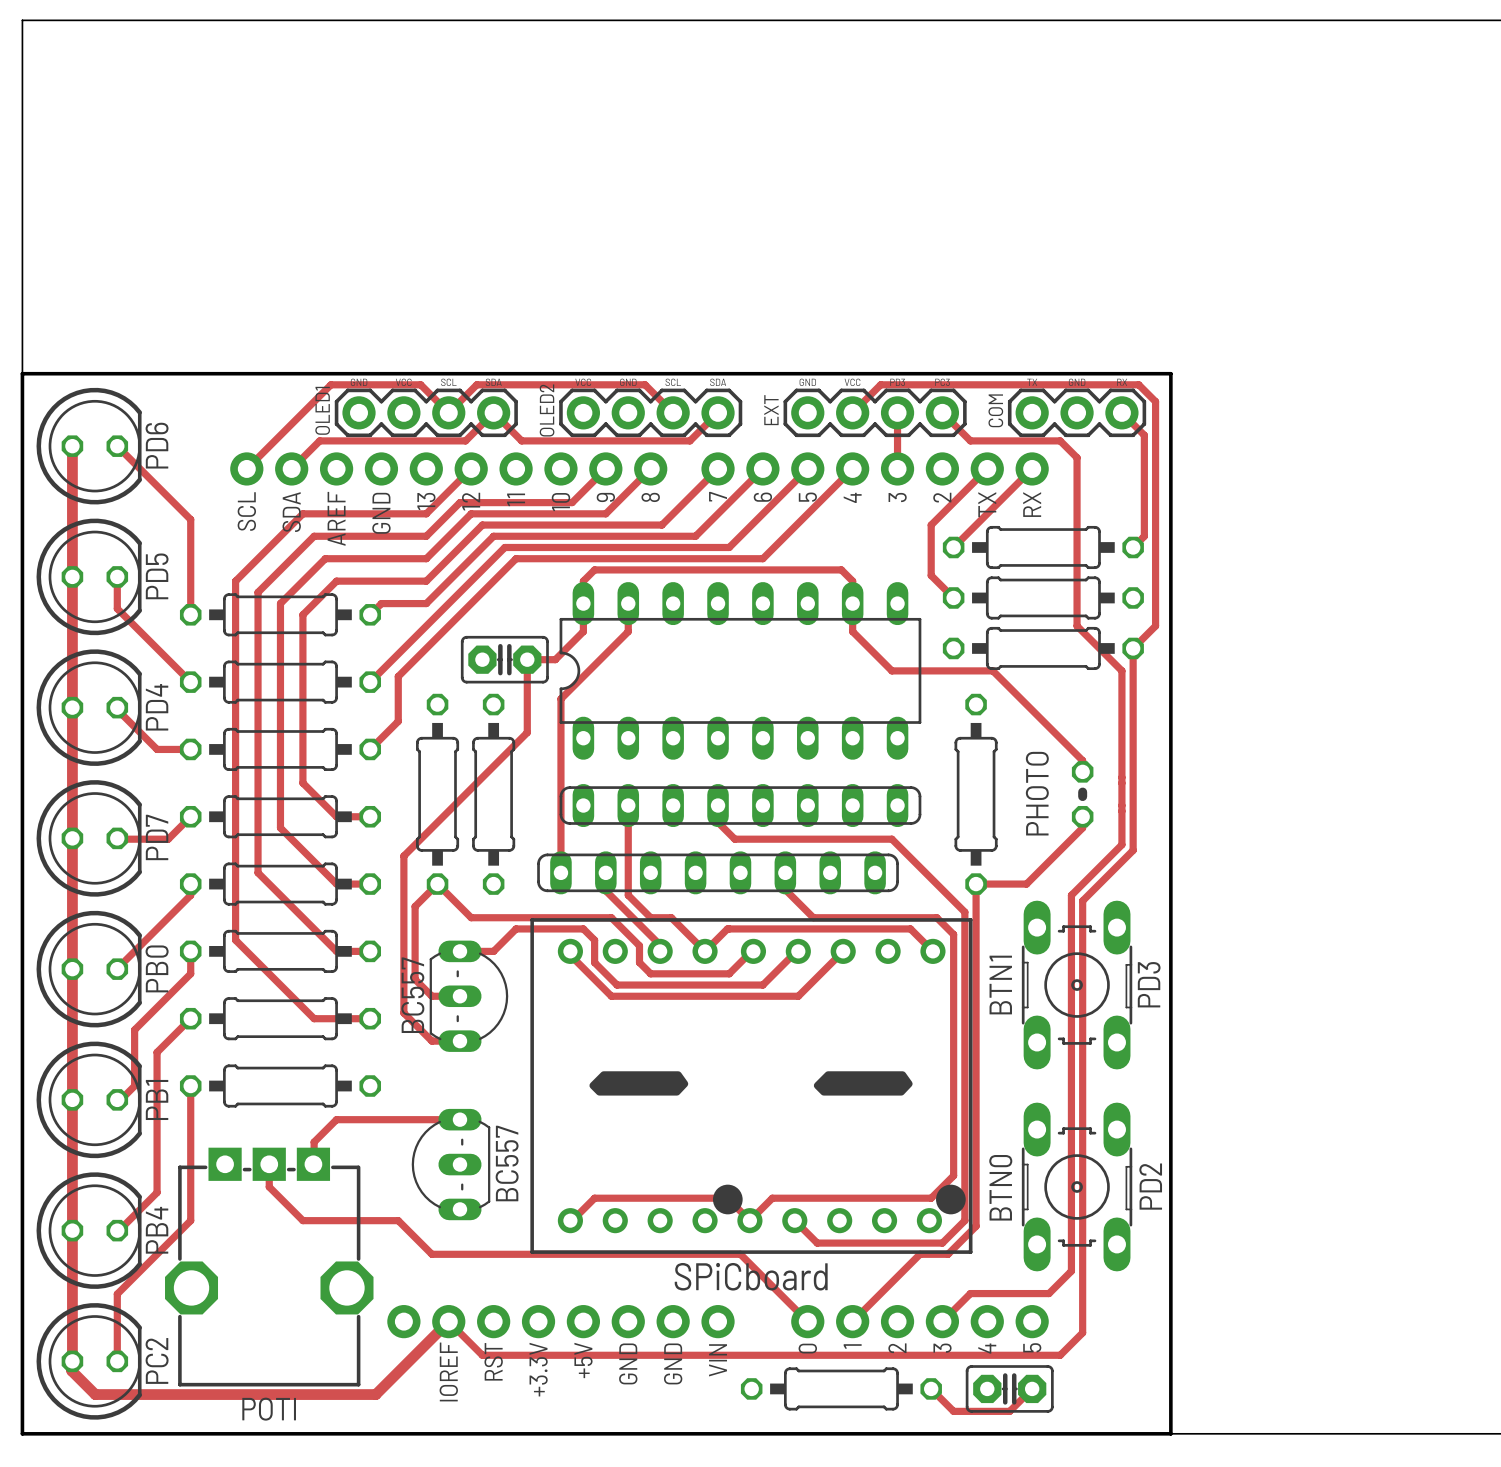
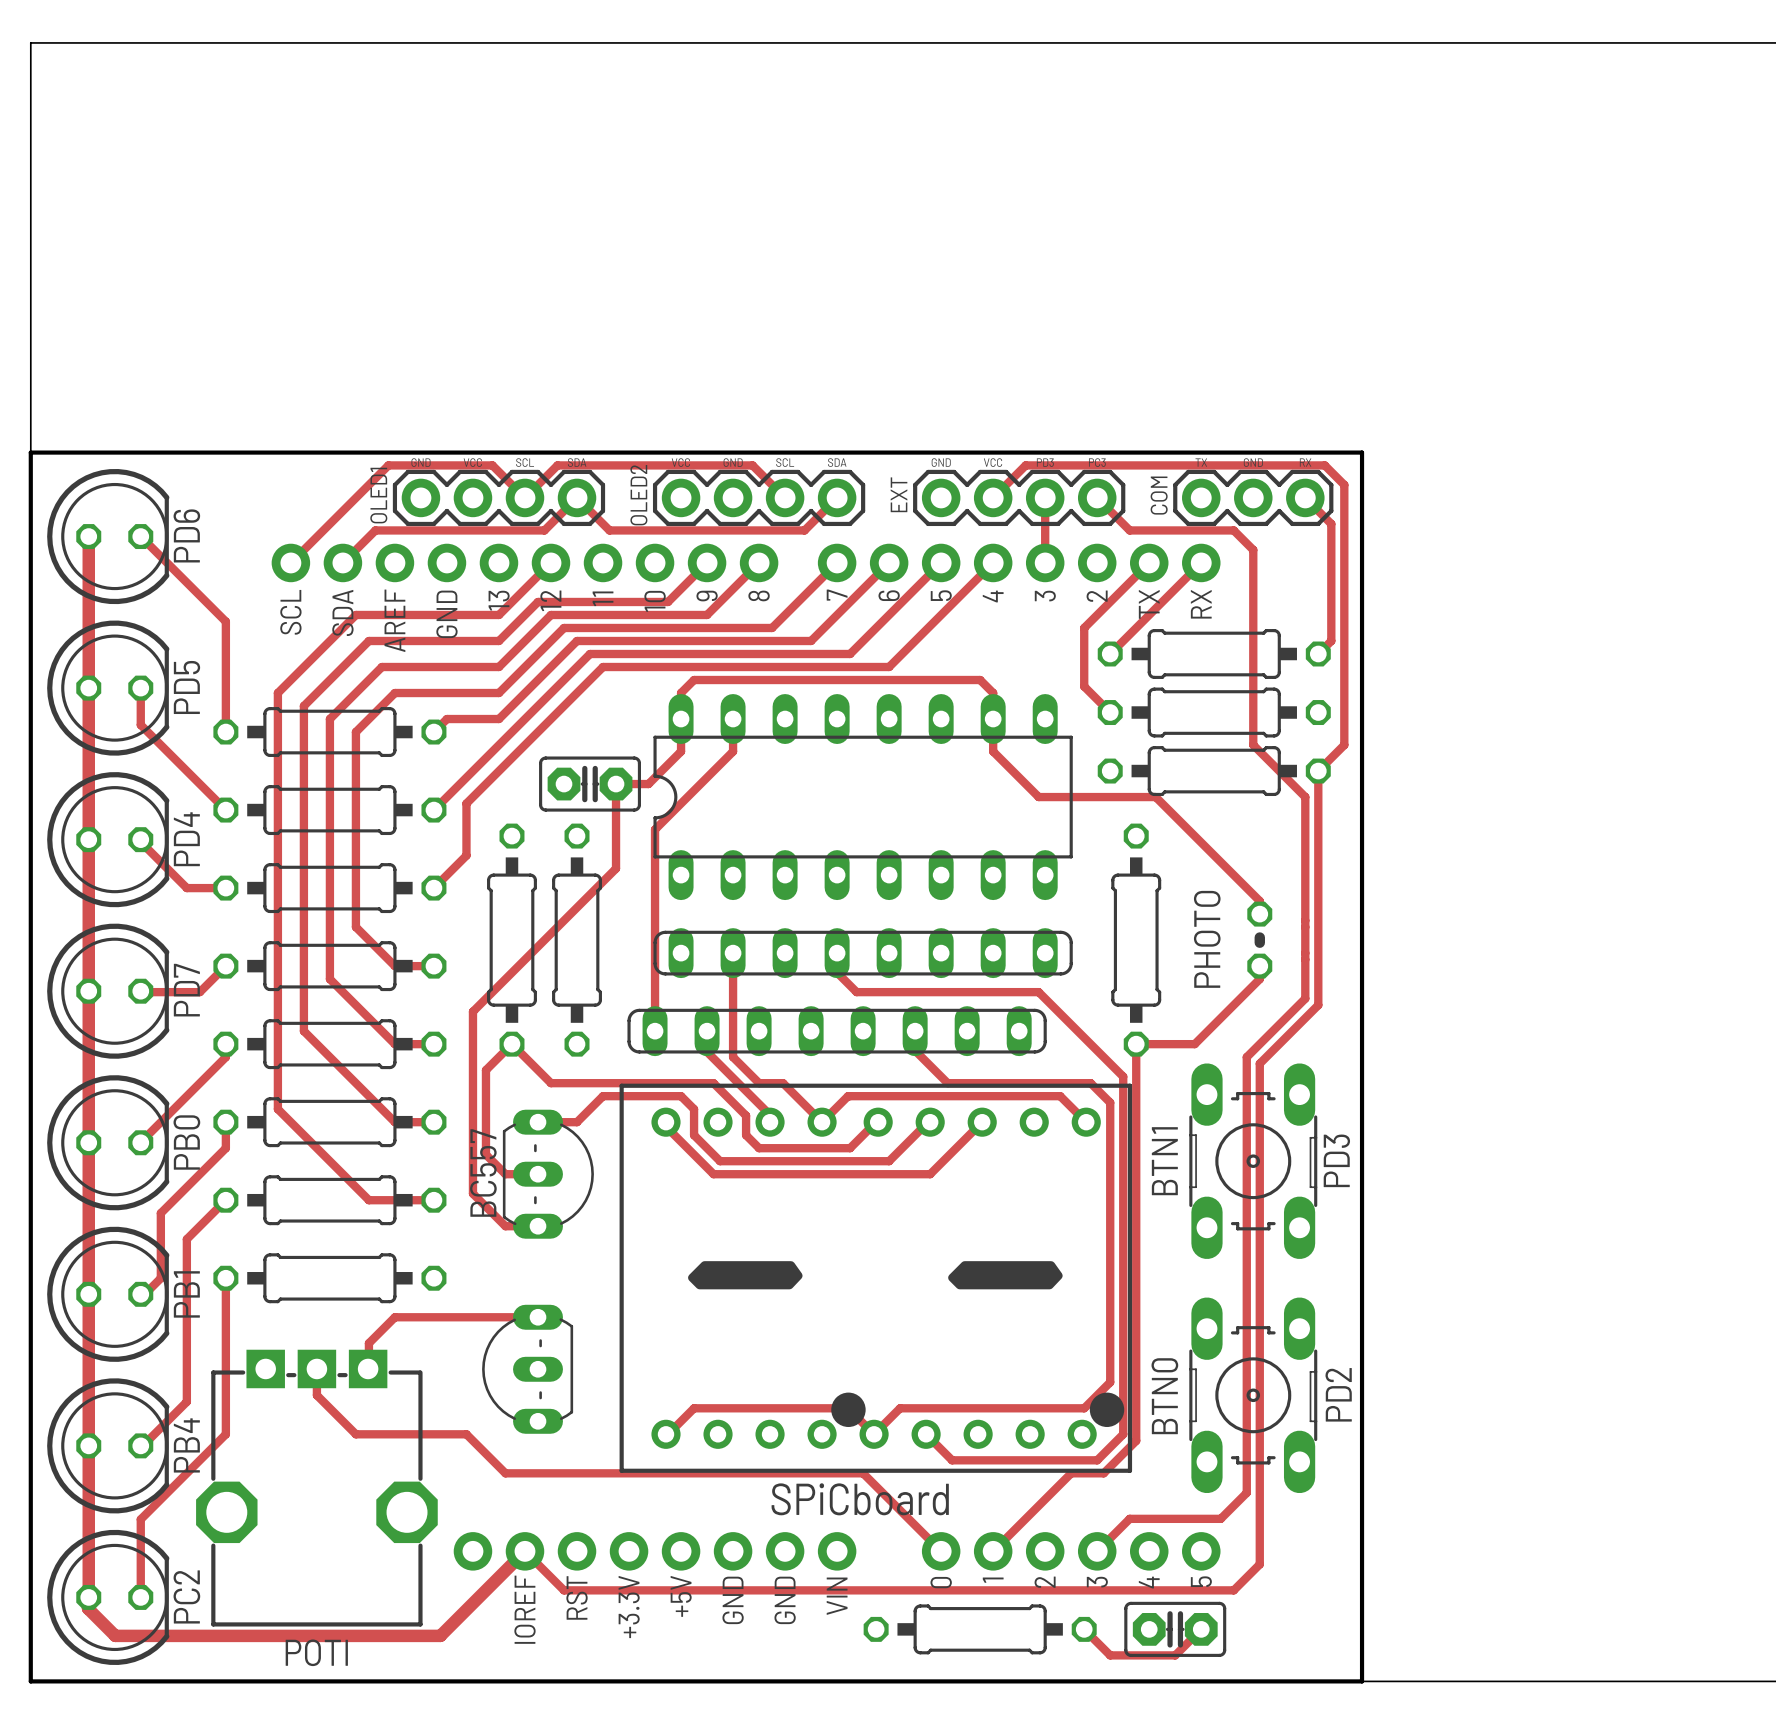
part value: BC557 (507, 1163) -> none
text position: SPiCboard (751, 1276) -> SPiCboard (860, 1499)

